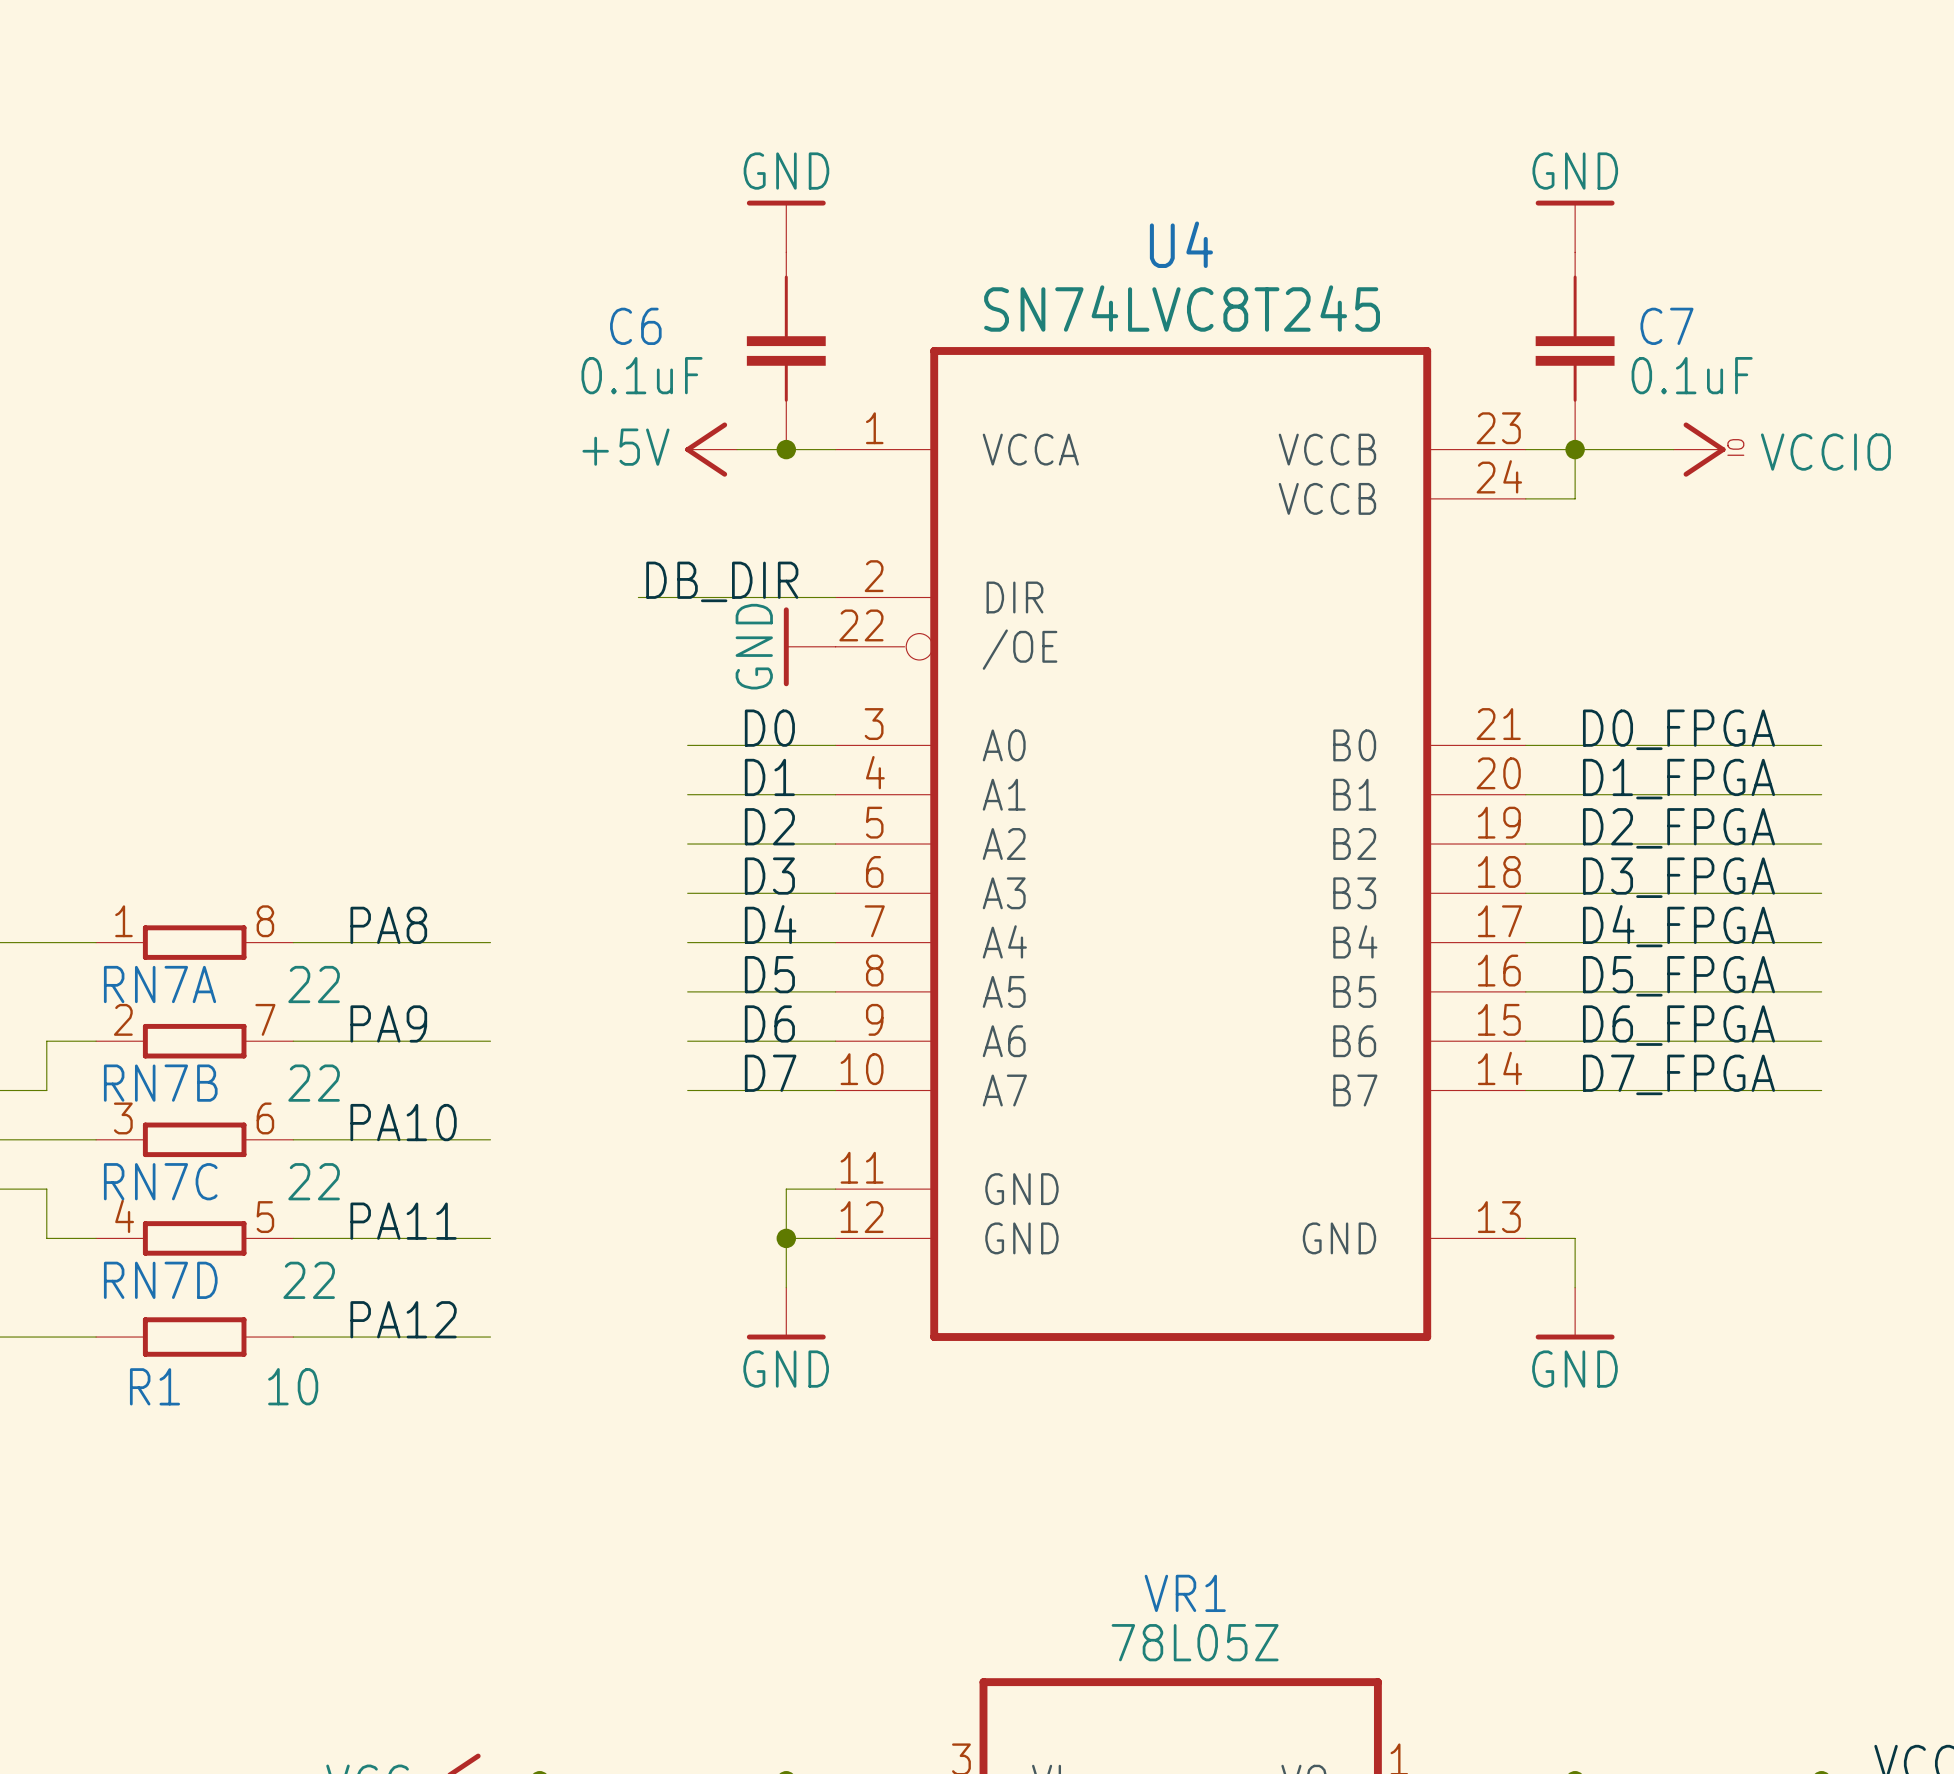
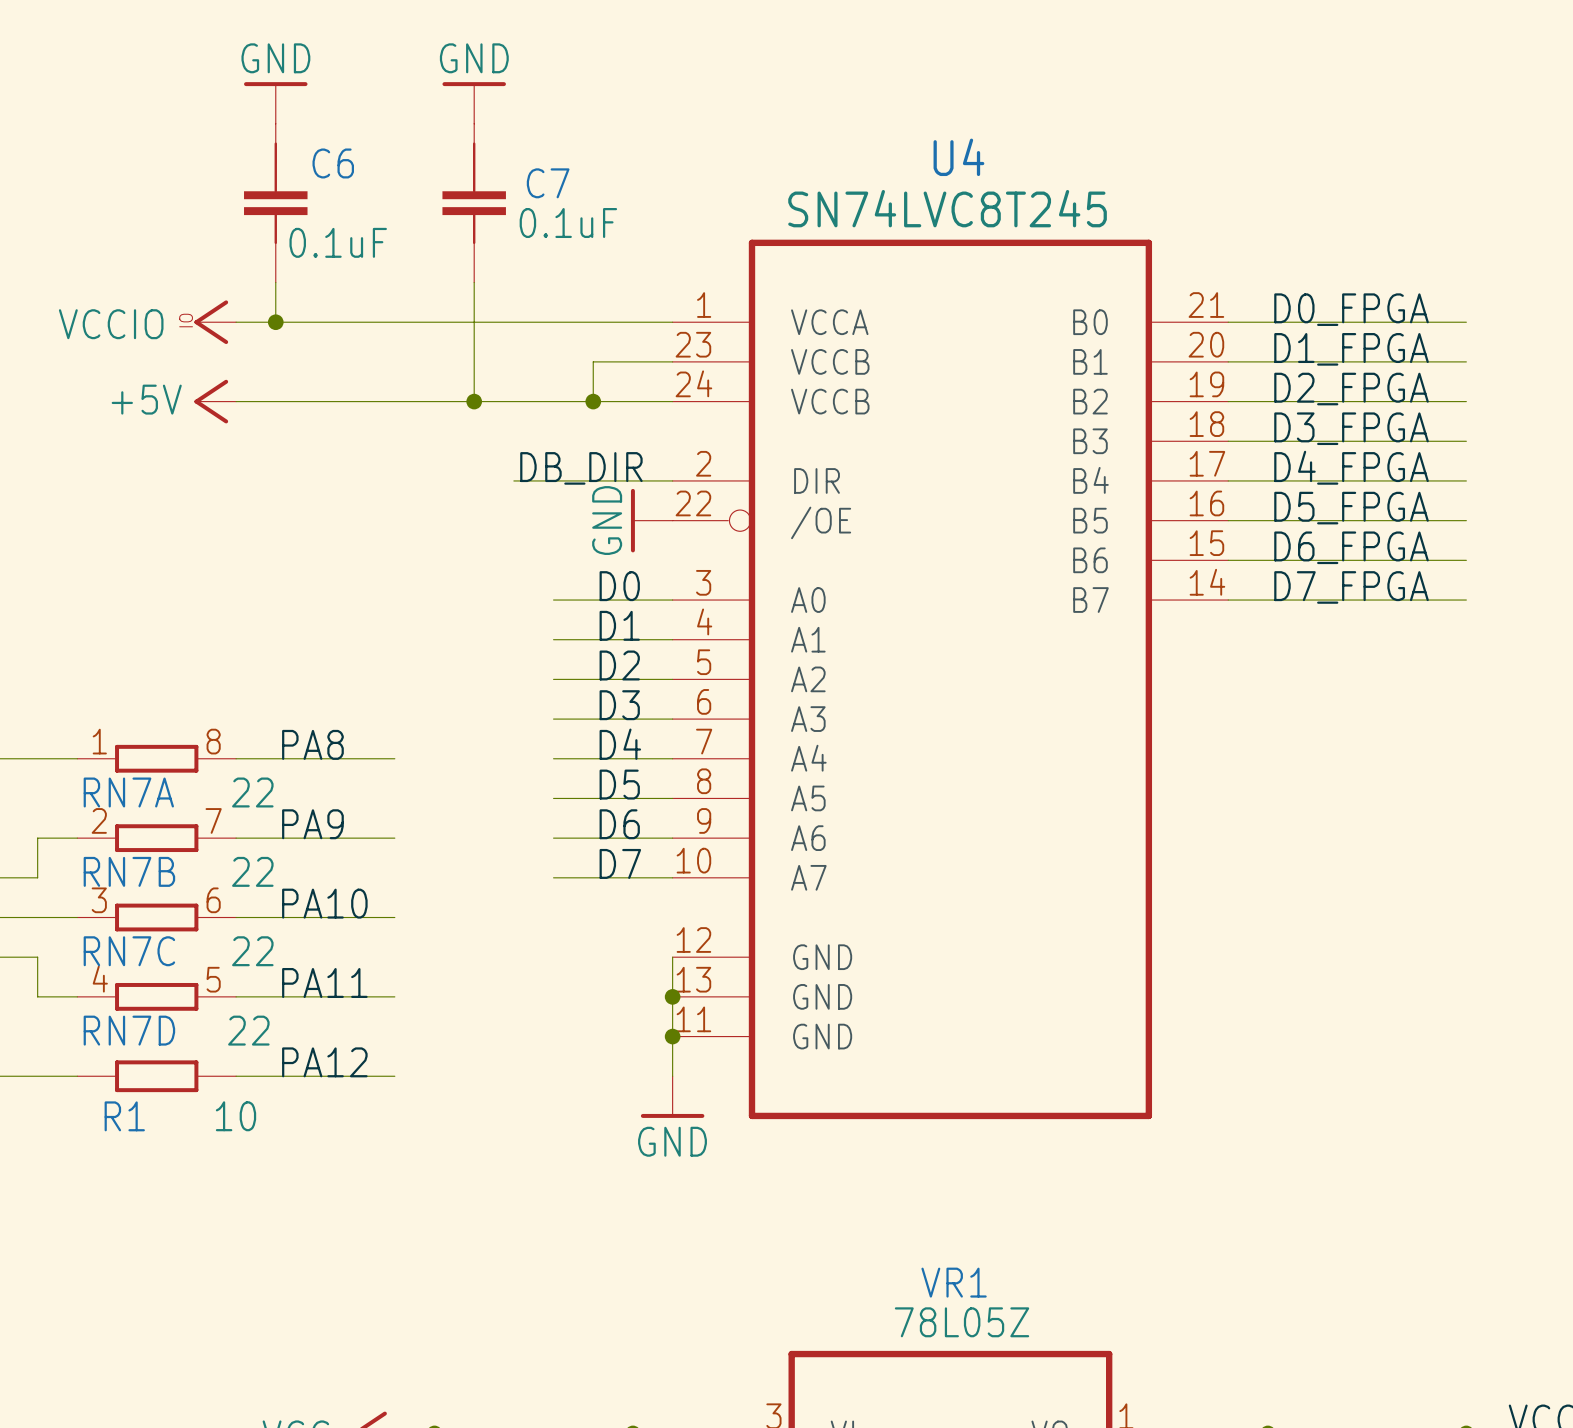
power symbol: none -> GND (275, 102)
power symbol position: GND (786, 226) -> GND (474, 102)
power symbol: GND (1575, 226) -> none
U4 name position: U4 (1181, 244) -> U4 (958, 157)
U4 value position: SN74LVC8T245 (1182, 308) -> SN74LVC8T245 (947, 208)
C6 name position: C6 (635, 326) -> C6 (333, 163)
U4 symbol: [835, 347, 1526, 1341] -> [672, 239, 1229, 1120]
wire: none -> (275, 282) (275, 322)
wire: none -> (474, 282) (474, 401)
C6 position: (786, 350) -> (275, 203)
C7 position: (1575, 350) -> (474, 203)
C6 value position: 0.1uF (642, 375) -> 0.1uF (338, 242)
label: none -> D0_FPGA (1351, 309)
power symbol: none -> VCCIO (215, 322)
wire: none -> (236, 322) (672, 322)
junction: none -> (275, 322)
power symbol position: +5V (711, 449) -> +5V (215, 401)
wire: none -> (593, 361) (593, 401)
junction position: (786, 449) -> (593, 401)
wire: (1575, 449) (1575, 498) -> (1466, 401) (1267, 401)
junction: (1575, 449) -> none
wire: none -> (1347, 361) (1466, 361)
power symbol: VCCIO (1699, 449) -> none
wire: none -> (236, 401) (672, 401)
junction: none -> (474, 401)
label: D0_FPGA (1678, 729) -> D7_FPGA (1351, 587)
label position: D1_FPGA (1678, 779) -> D1_FPGA (1351, 349)
wire: (1525, 794) (1821, 794) -> (1228, 322) (1466, 322)
label position: D2_FPGA (1678, 828) -> D2_FPGA (1351, 389)
wire: (1525, 844) (1821, 844) -> none
label position: D3_FPGA (1678, 877) -> D3_FPGA (1351, 428)
wire: (1525, 893) (1821, 893) -> none
label position: D4_FPGA (1678, 926) -> D4_FPGA (1351, 467)
wire: (1525, 942) (1821, 942) -> (1228, 441) (1466, 441)
label position: D5_FPGA (1678, 976) -> D5_FPGA (1351, 508)
wire: (1525, 991) (1821, 991) -> (1228, 480) (1466, 480)
label position: D6_FPGA (1678, 1025) -> D6_FPGA (1351, 547)
wire: (1525, 1041) (1821, 1041) -> (1228, 520) (1466, 520)
label: D7_FPGA (1678, 1074) -> none
wire: (1525, 1090) (1821, 1090) -> (1228, 560) (1466, 560)
wire: (835, 1189) (786, 1189) (786, 1287) -> (672, 957) (672, 1076)
wire: (786, 1238) (835, 1238) -> none
junction: (786, 1238) -> none
junction: none -> (672, 996)
wire: (1525, 1238) (1575, 1238) (1575, 1287) -> none
junction: none -> (672, 1036)
power symbol position: GND (786, 1313) -> GND (672, 1097)
power symbol: GND (1575, 1313) -> none

